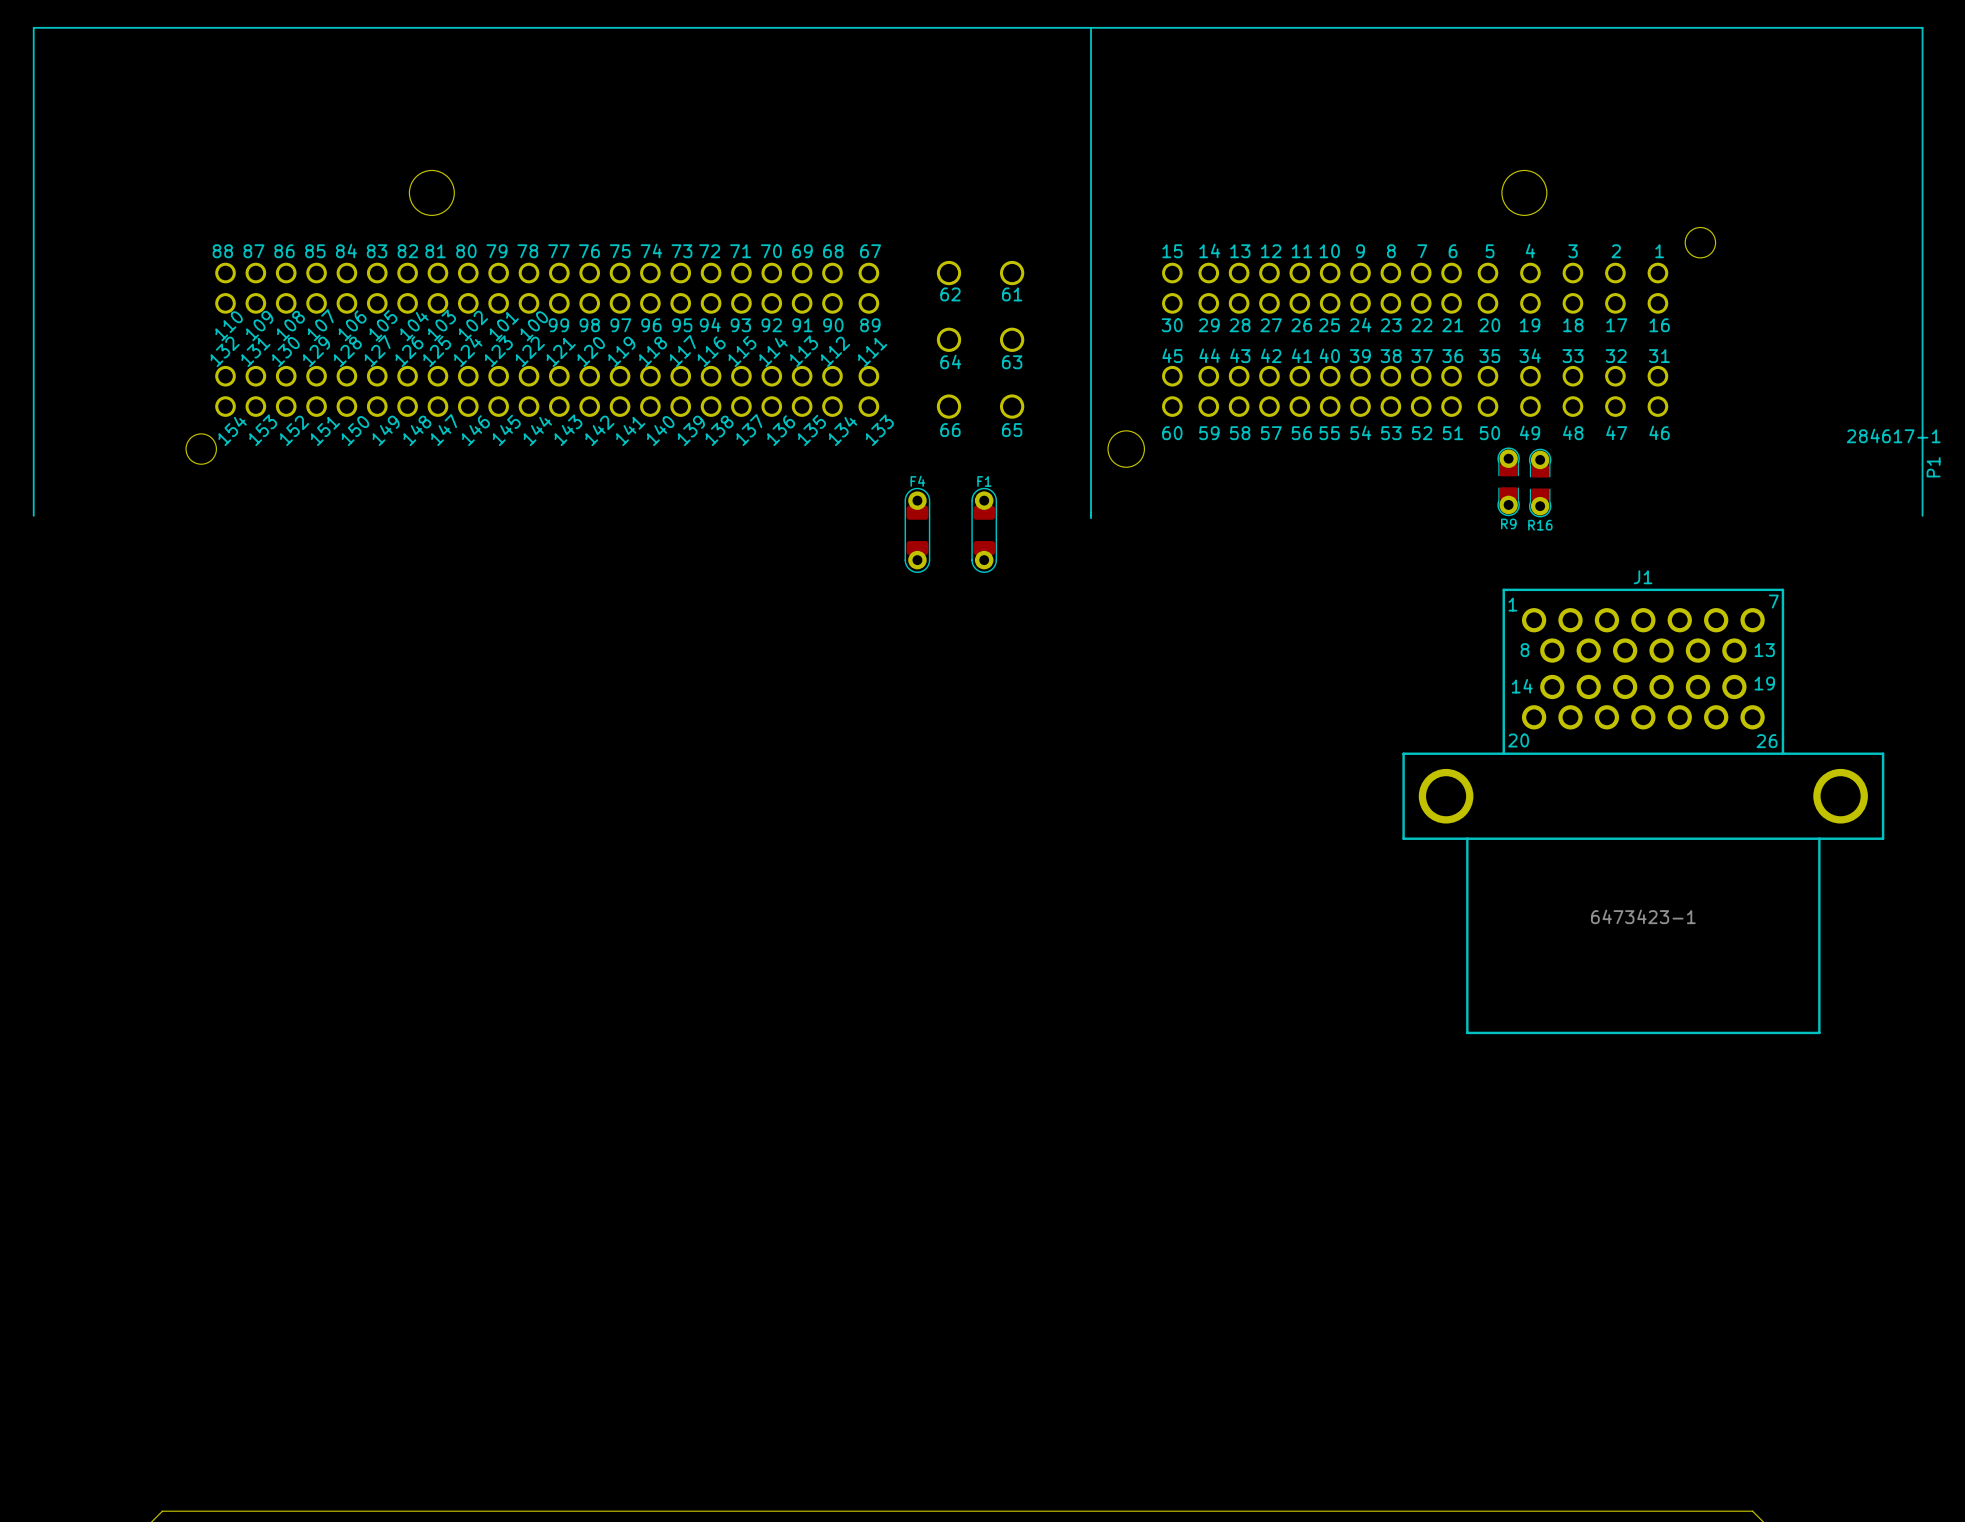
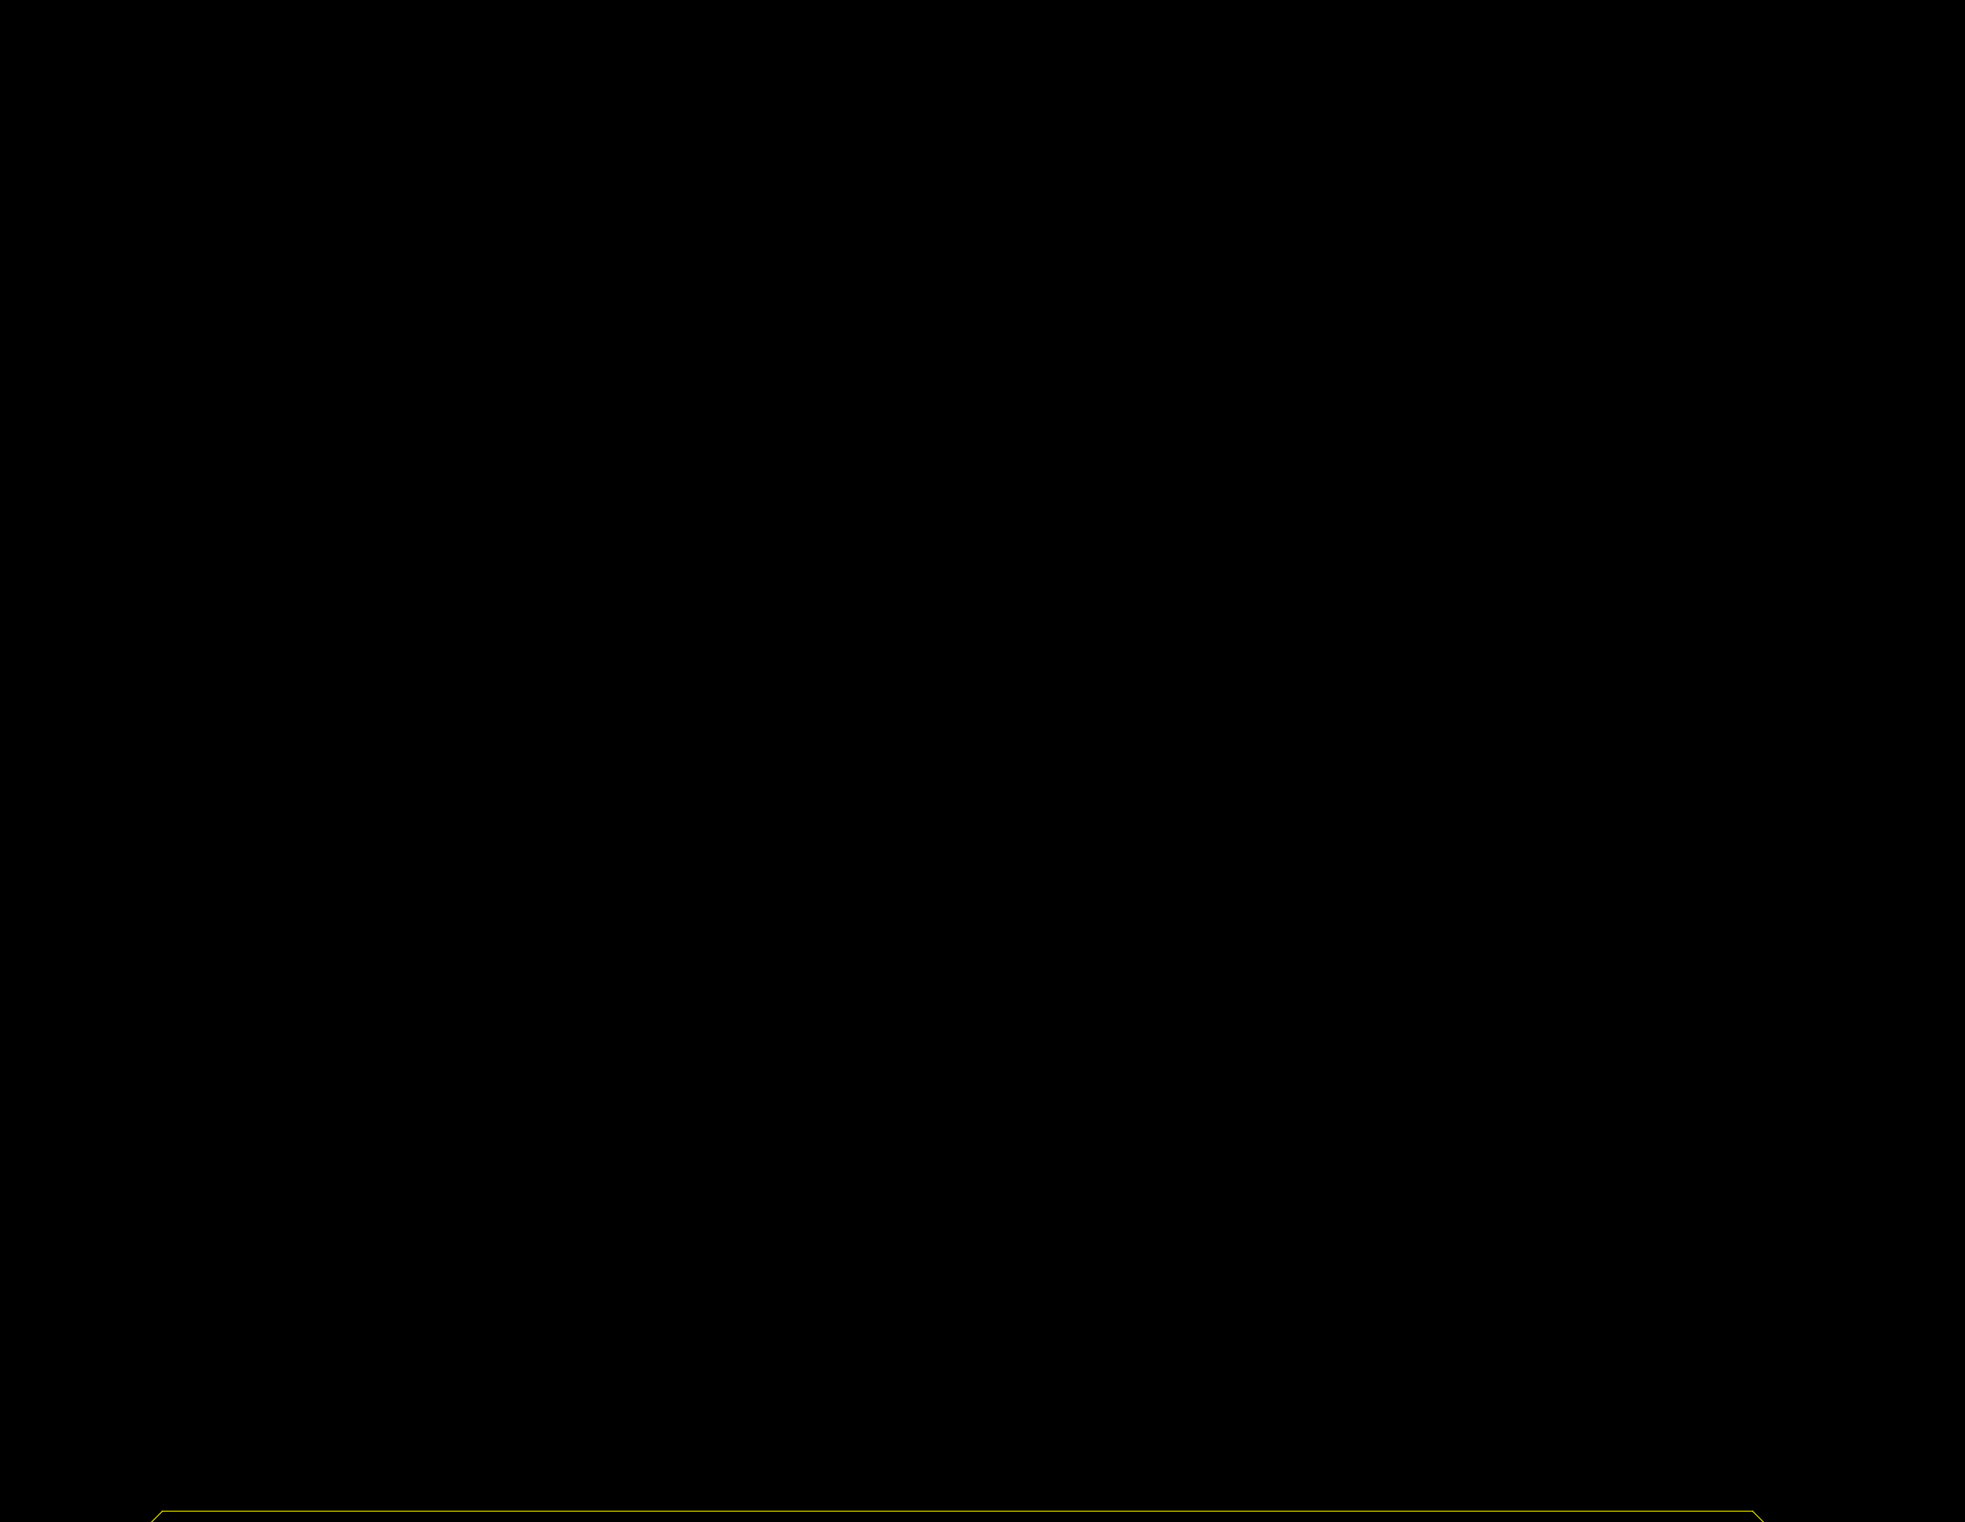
P1: 284617-1 (978, 273) -> none
R9: (1508, 481) -> none
R16: (1540, 483) -> none
F4: (917, 530) -> none
F1: (984, 530) -> none
J1: 6473423-1 (1643, 811) -> none

